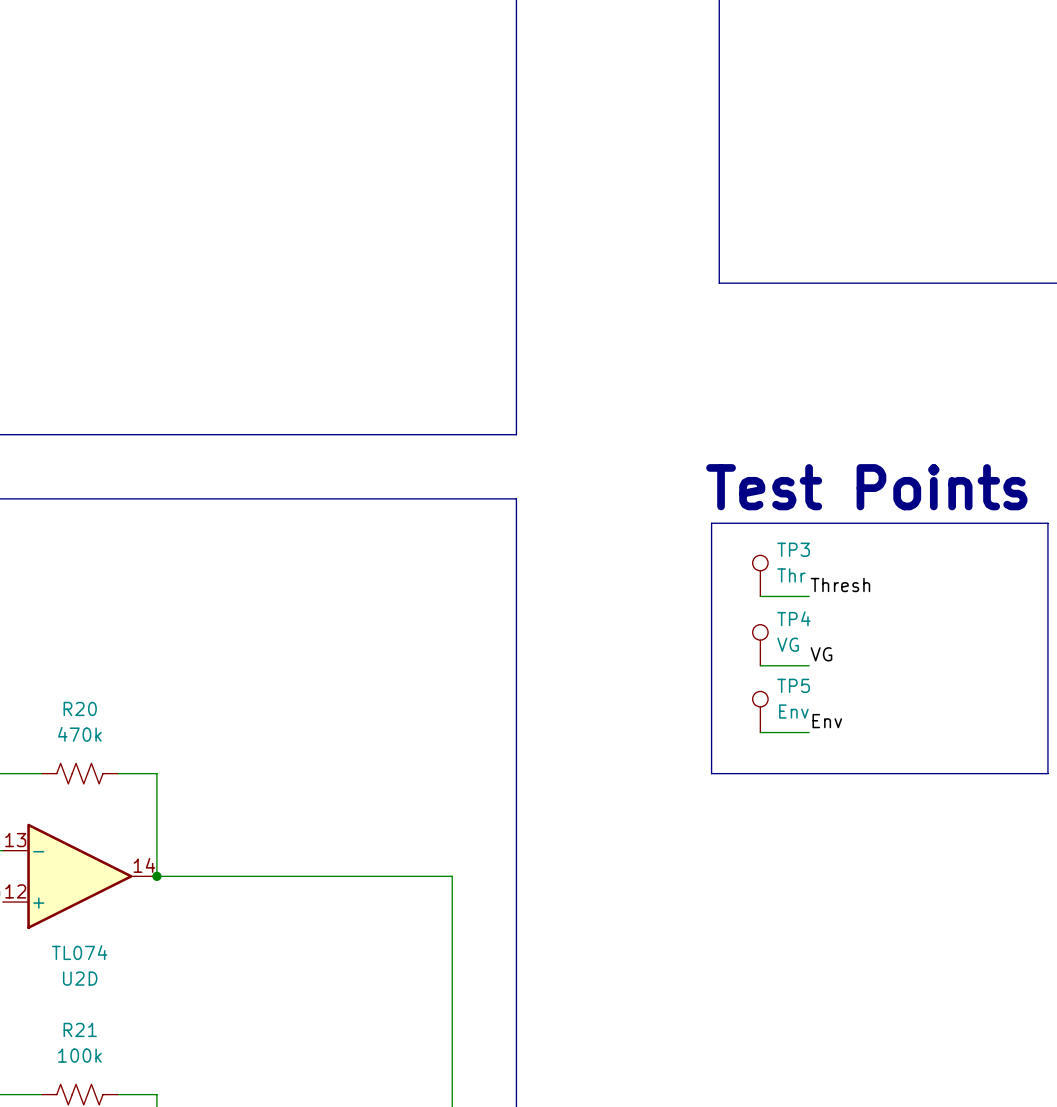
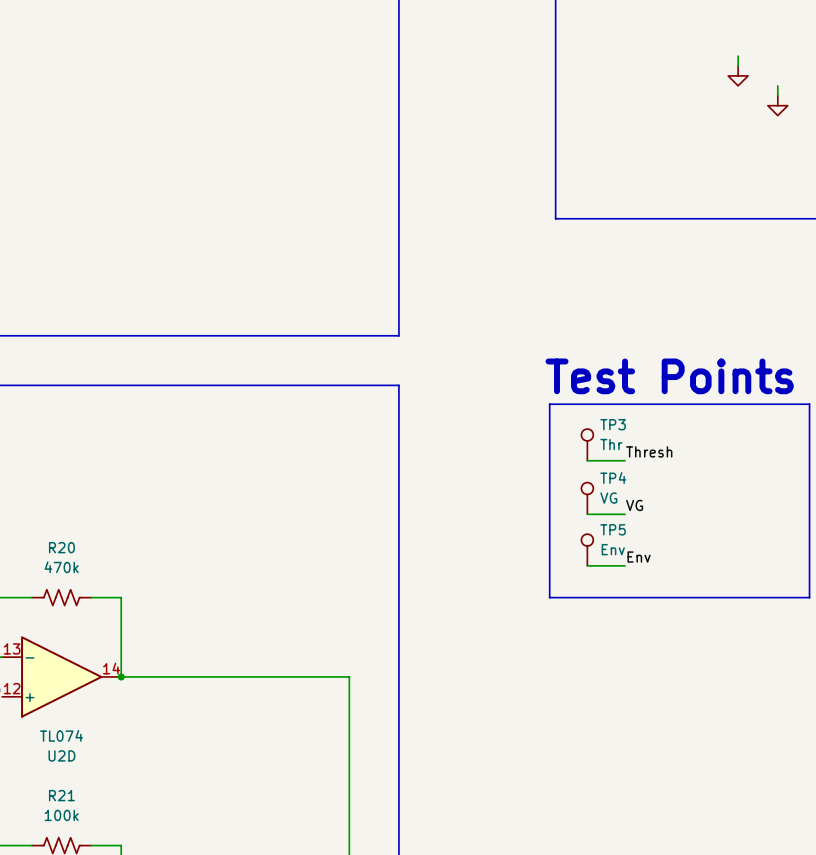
wire: none -> (738, 56) (738, 66)
power symbol: none -> (738, 75)
wire: none -> (777, 85) (777, 95)
power symbol: none -> (777, 105)

